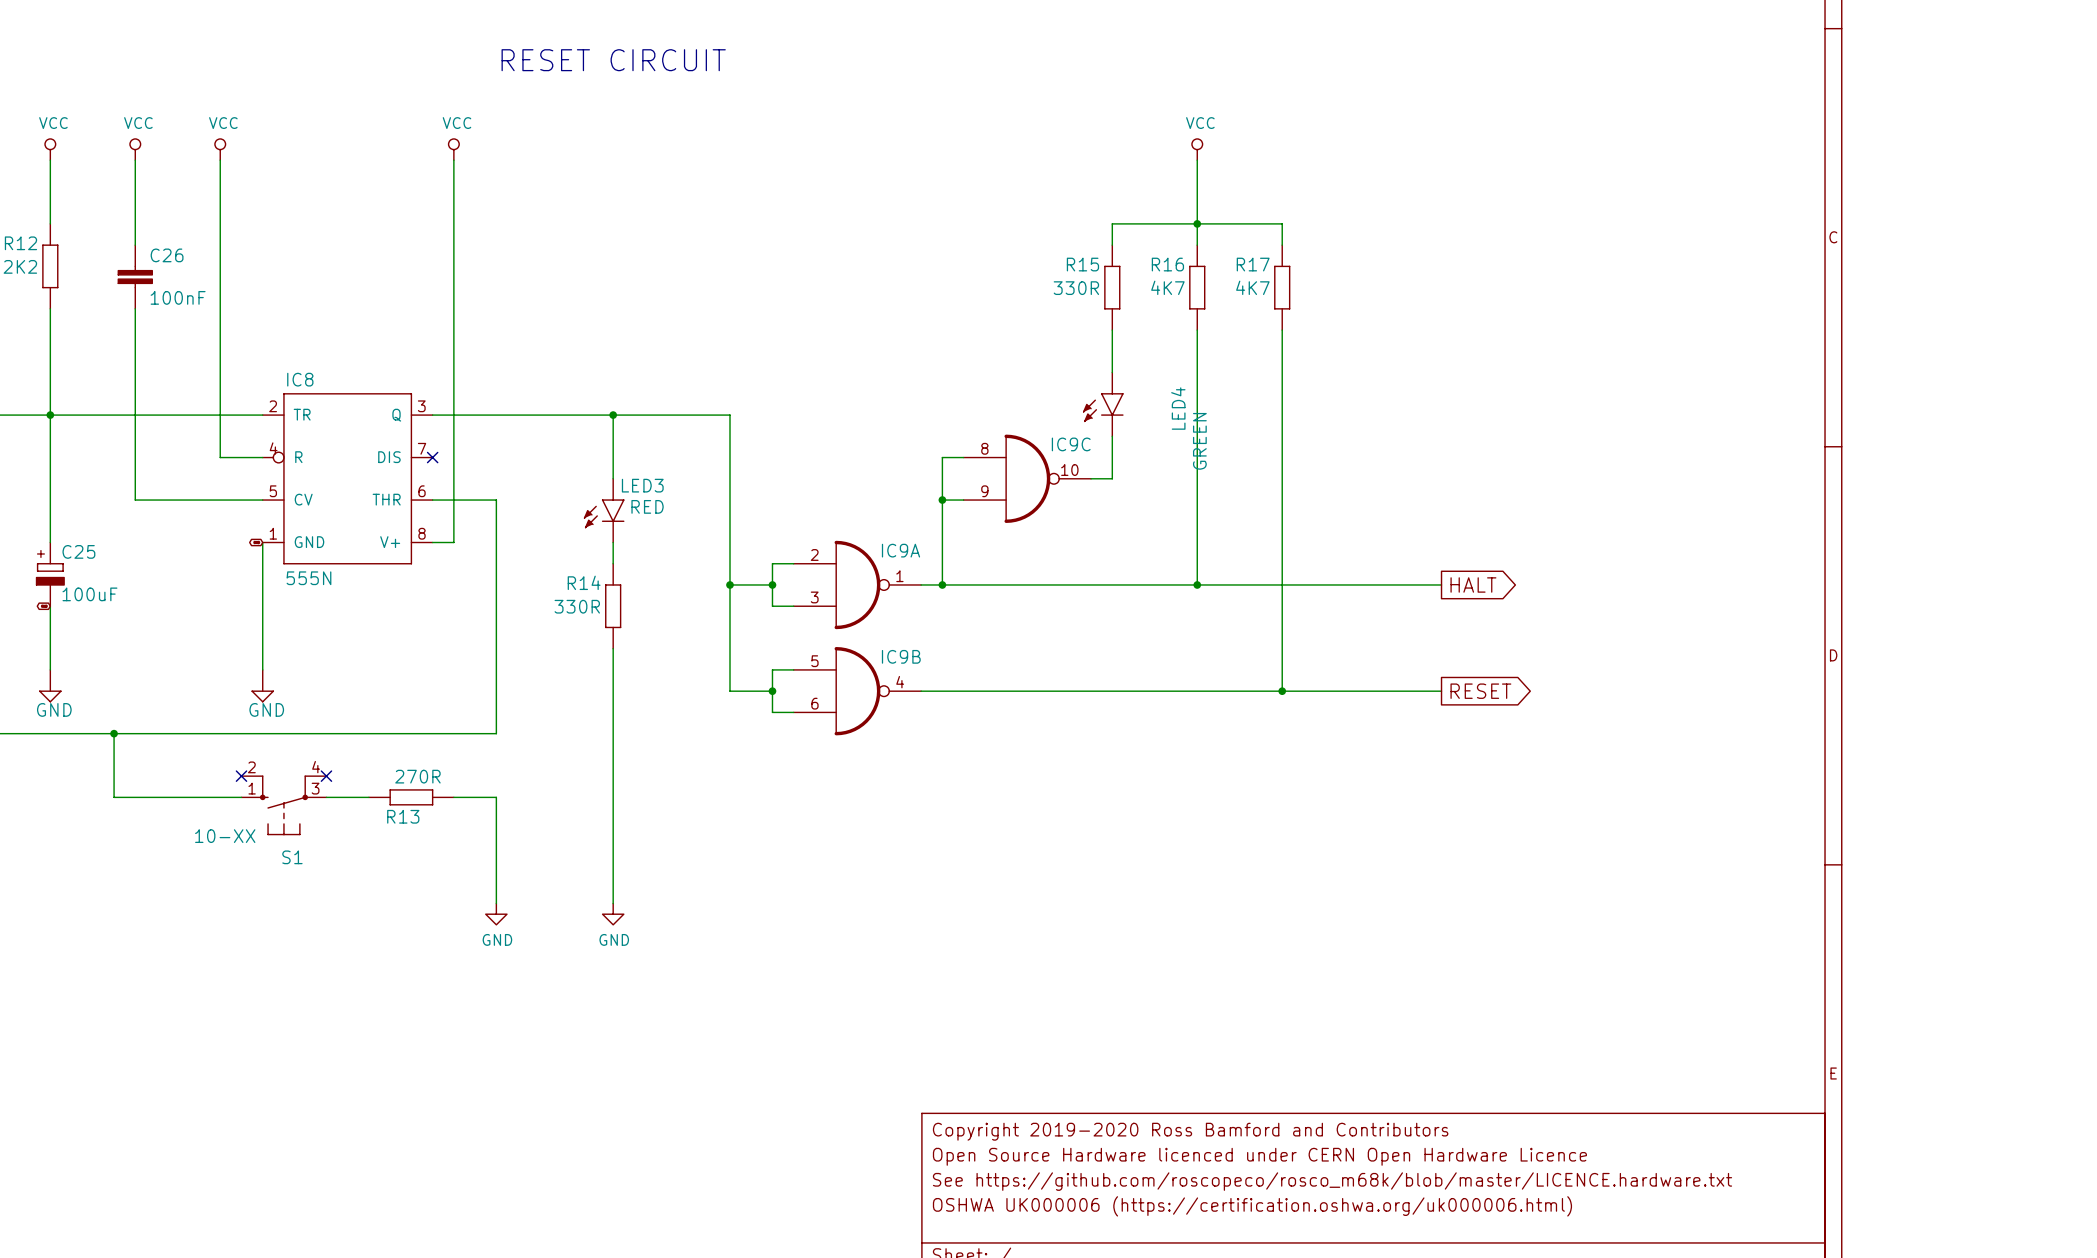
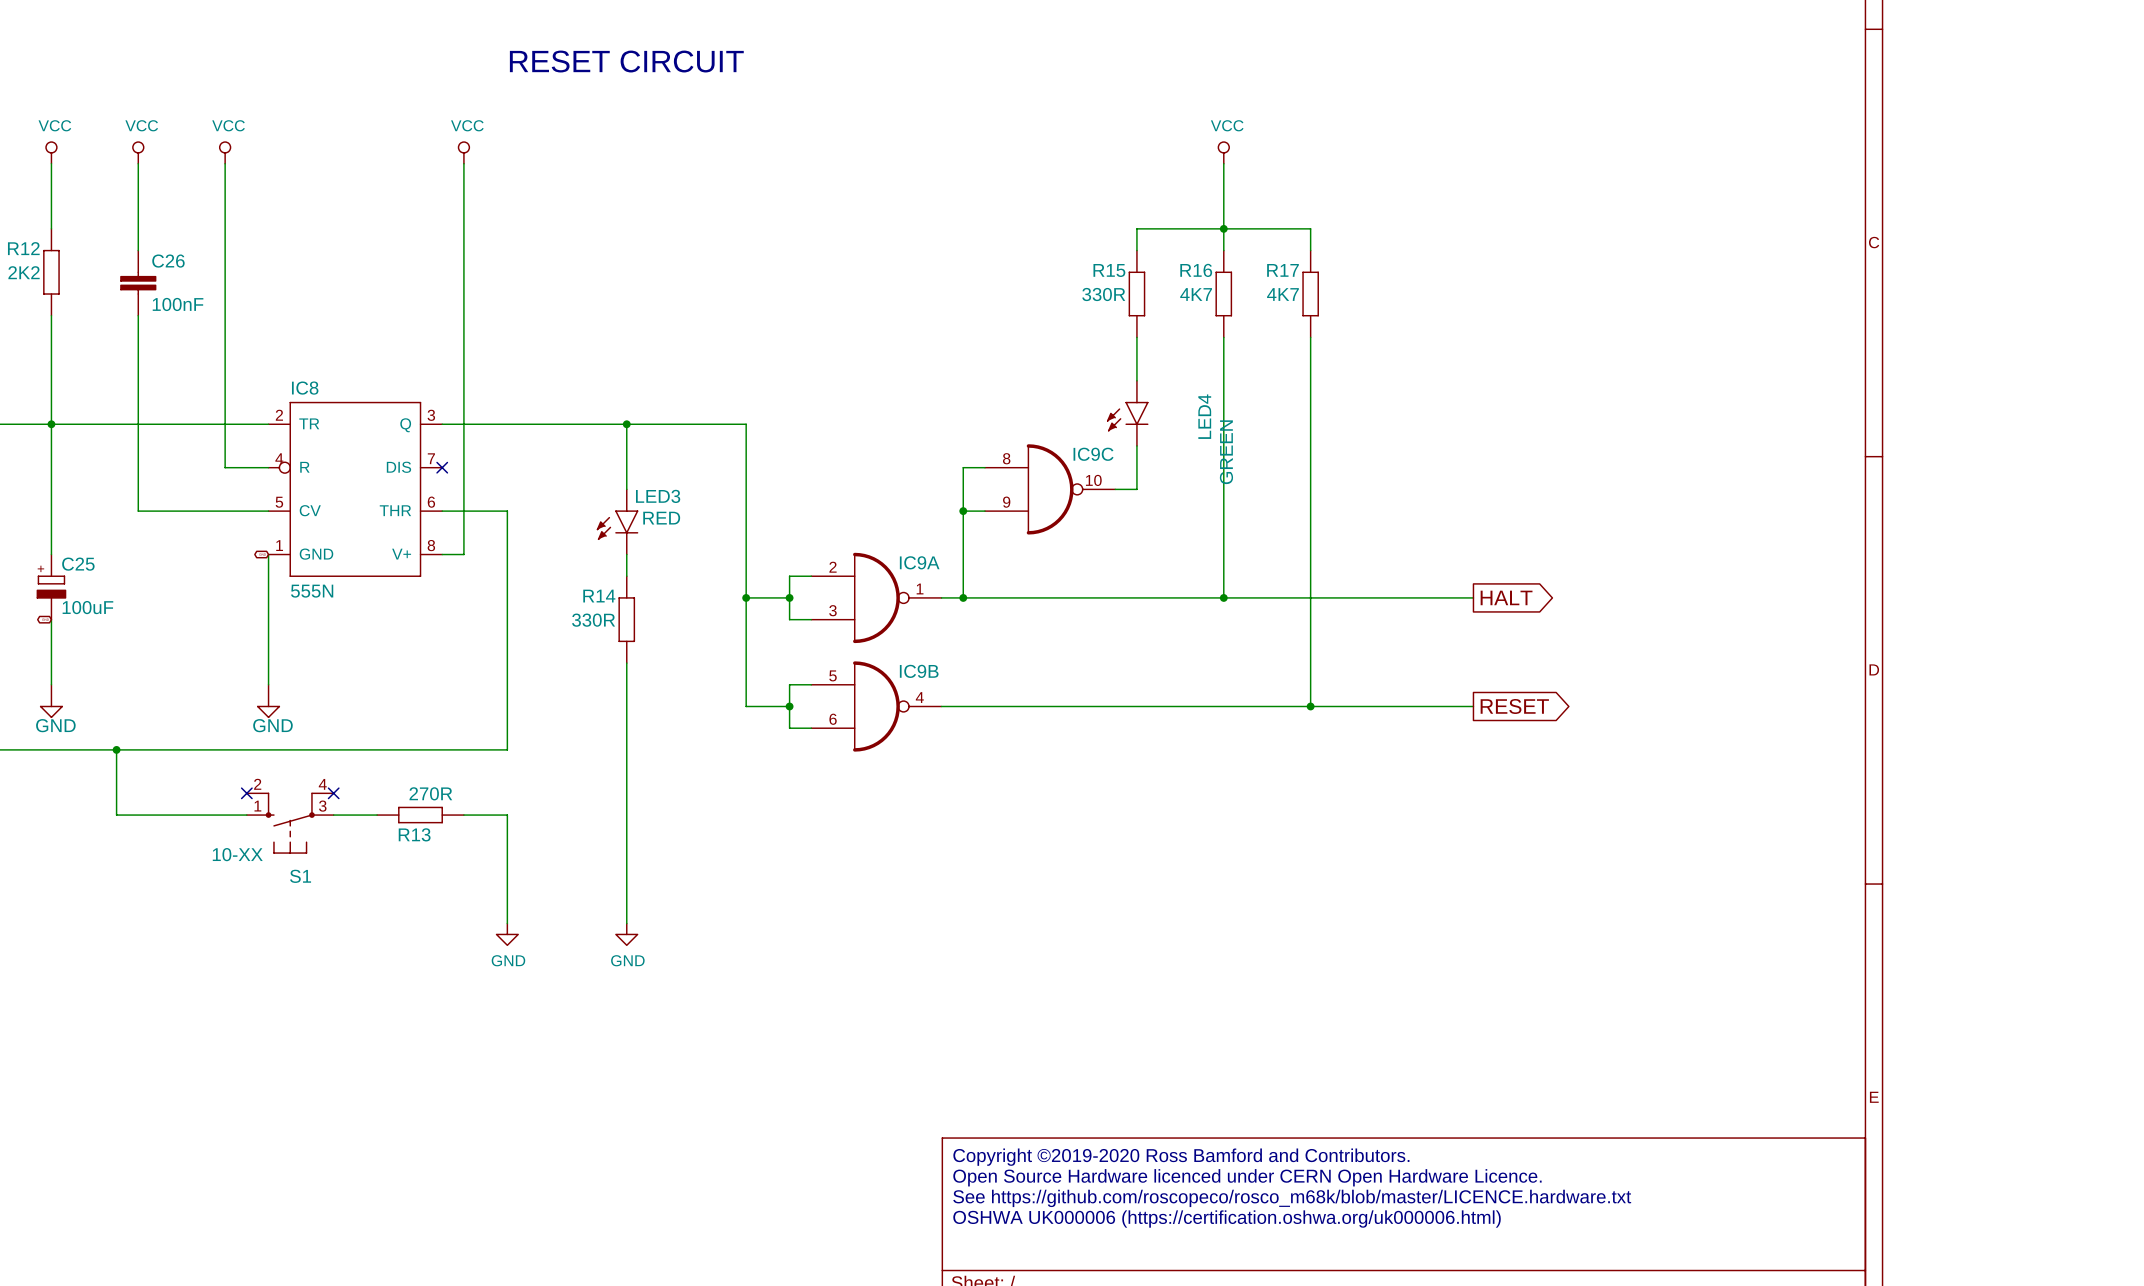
title block: Copyright 2019-2020 Ross Bamford and Contributors (1190, 1131) -> none
text: none -> Copyright ©2019-2020 Ross Bamford and Contributors. (1181, 1157)
text: none -> Open Source Hardware licenced under CERN Open Hardware Licence. (1247, 1177)
title block: Open Source Hardware licenced under CERN Open Hardware Licence (1259, 1156) -> none
text: none -> See https://github.com/roscopeco/rosco_m68k/blob/master/LICENCE.hardware.txt (1292, 1198)
title block: See https://github.com/roscopeco/rosco_m68k/blob/master/LICENCE.hardware.txt (1332, 1181) -> none
text: none -> OSHWA UK000006 (https://certification.oshwa.org/uk000006.html) (1227, 1219)
title block: OSHWA UK000006 (https://certification.oshwa.org/uk000006.html) (1252, 1206) -> none

